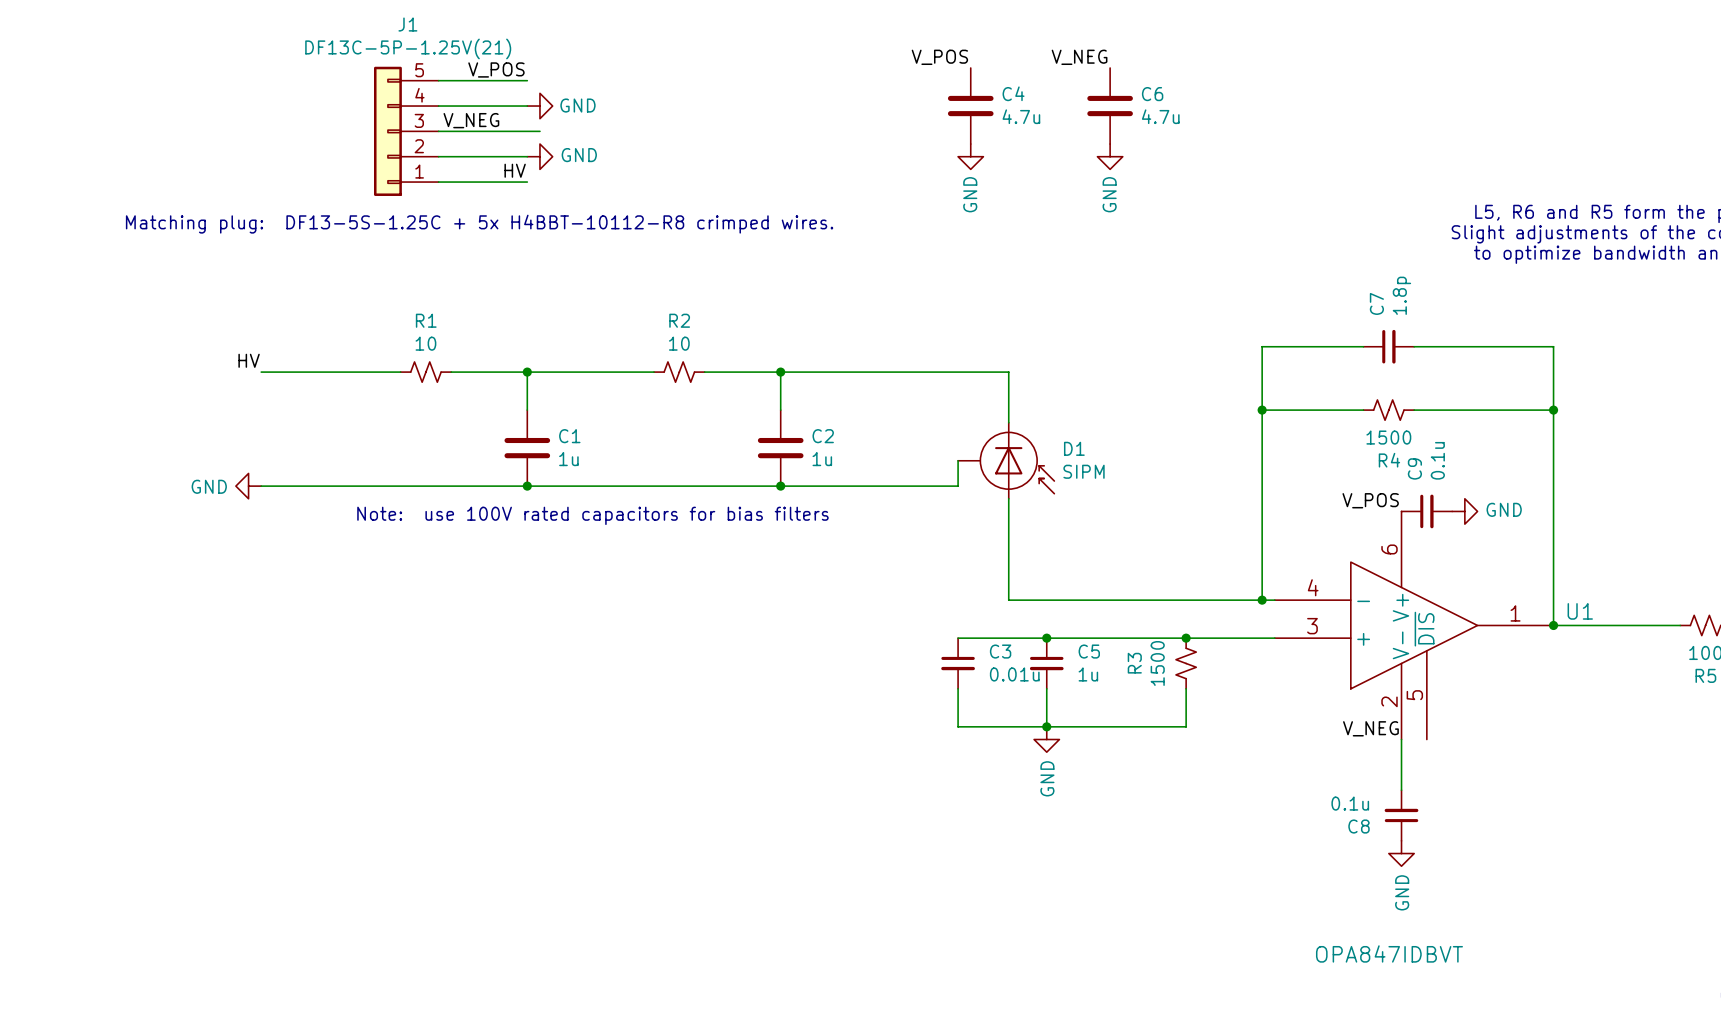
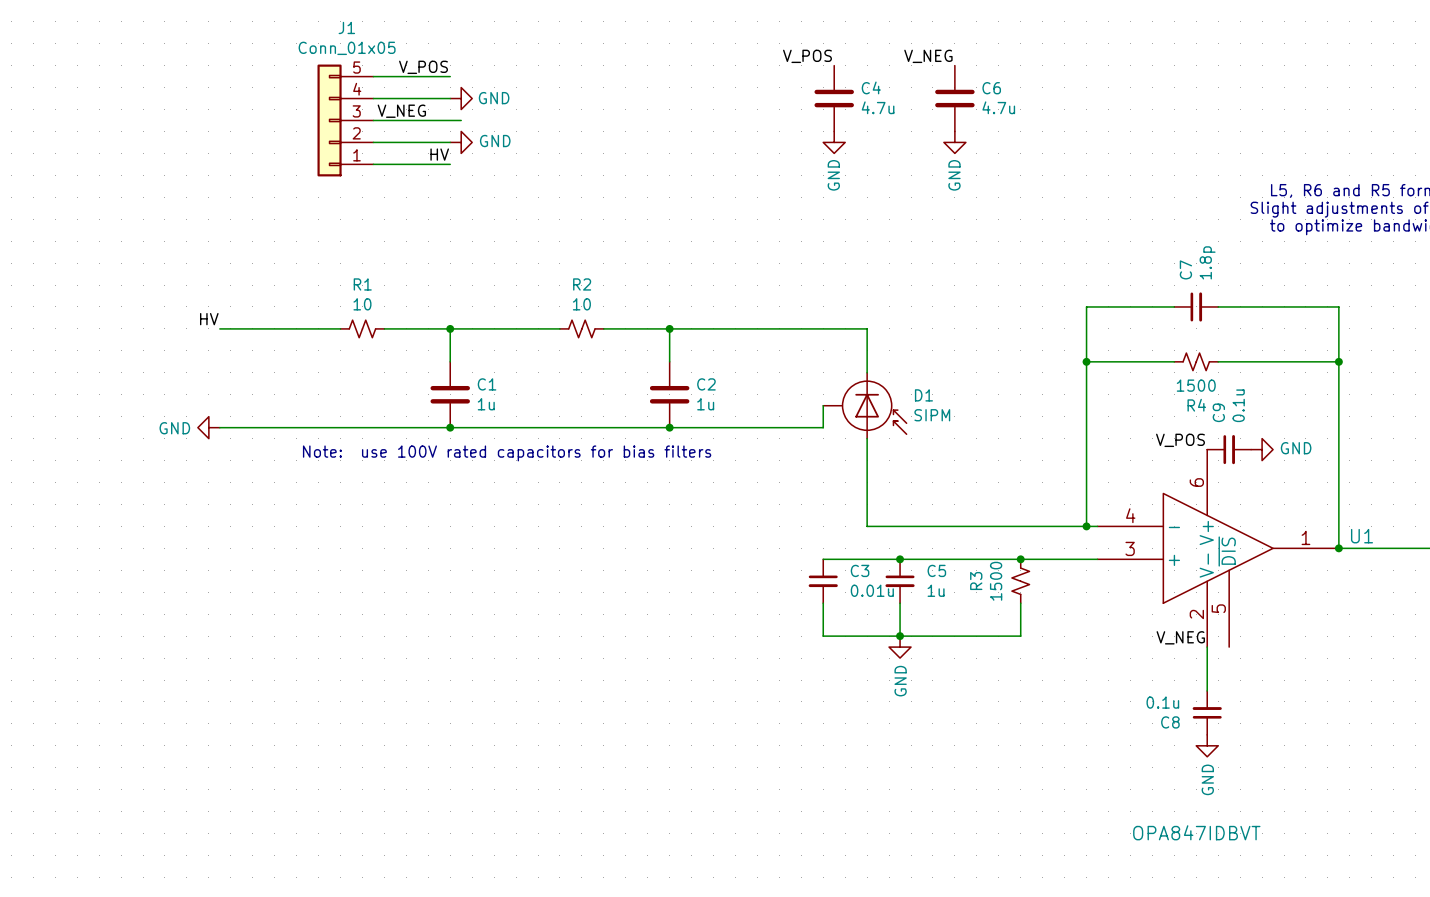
J1 value: DF13C-5P-1.25V(21) (408, 48) -> Conn_01x05 (347, 48)
text: Matching plug: DF13-5S-1.25C + 5x H4BBT-10112-R8 crimped wires. (479, 224) -> none

